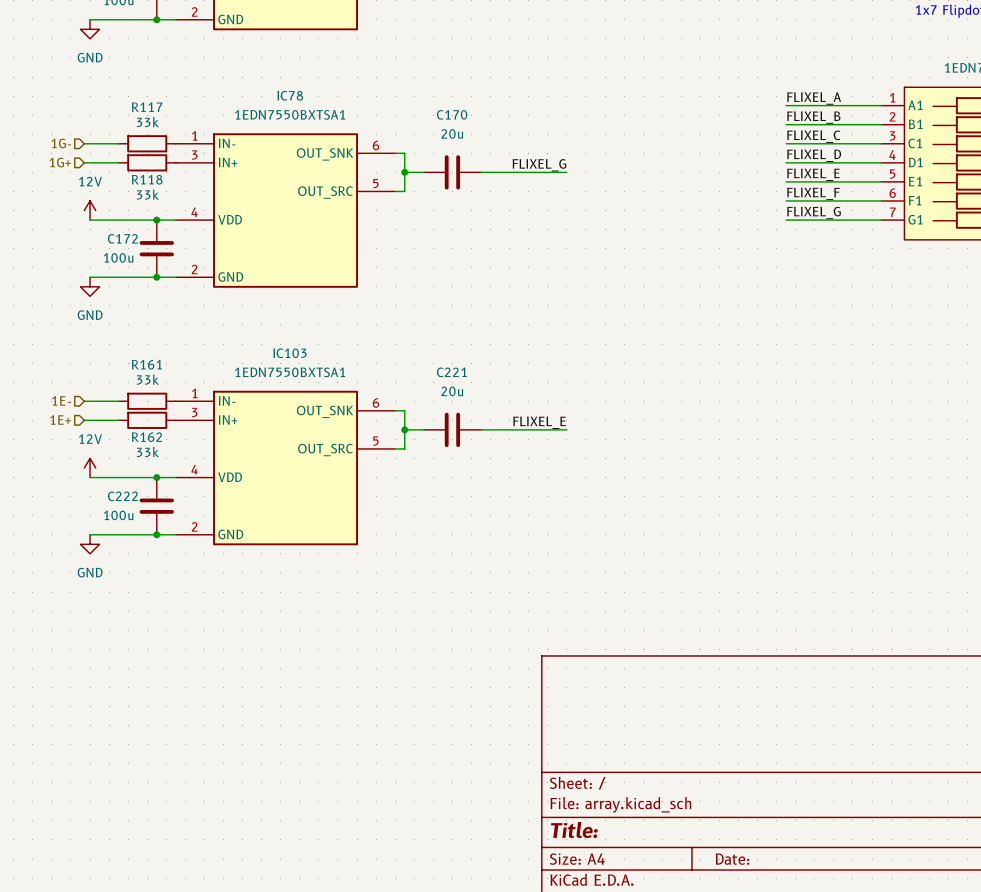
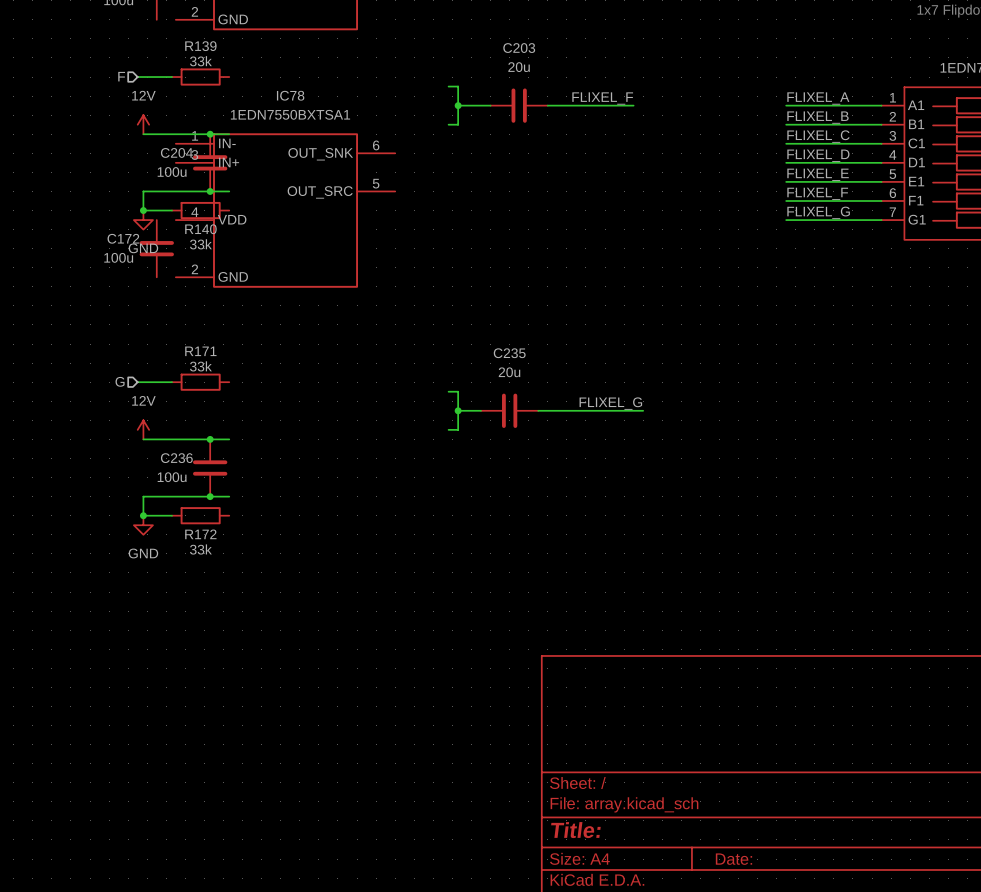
wire: (90, 19) (175, 19) -> none
junction: (156, 19) -> none
power symbol: GND (90, 29) -> none
hierarchical label: none -> F (121, 76)
R139: none -> 33k (200, 77)
label: none -> FLIXEL_F (602, 98)
wire: none -> (458, 105) (490, 105)
junction: none -> (458, 105)
C203: none -> 20u (519, 105)
power symbol: none -> 12V (143, 124)
junction: none -> (210, 134)
hierarchical label: 1G- (61, 143) -> none
wire: (84, 143) (118, 143) -> (137, 77) (172, 77)
R117: 33k (147, 143) -> none
wire: (395, 153) (404, 153) (404, 191) (395, 191) -> (448, 86) (458, 86) (458, 124) (448, 124)
hierarchical label: 1G+ (60, 162) -> none
wire: (84, 162) (118, 162) -> none
R118: 33k (147, 162) -> none
C204: none -> 100u (210, 162)
label: FLIXEL_G (539, 165) -> none
wire: (404, 172) (423, 172) -> none
junction: (404, 172) -> none
C170: 20u (452, 172) -> none
wire: (481, 172) (566, 172) -> (547, 105) (633, 105)
junction: none -> (210, 191)
wire: none -> (229, 191) (143, 191) (143, 210) (172, 210)
power symbol: 12V (90, 210) -> none
R140: none -> 33k (200, 210)
wire: (90, 220) (175, 220) -> (143, 134) (229, 134)
junction position: (156, 220) -> (143, 210)
wire: (90, 277) (175, 277) -> none
junction: (156, 277) -> none
power symbol position: GND (90, 286) -> GND (143, 220)
hierarchical label: none -> G (120, 381)
R171: none -> 33k (200, 382)
hierarchical label: 1E- (61, 400) -> none
wire: (84, 401) (118, 401) -> (137, 382) (172, 382)
R161: 33k (147, 401) -> none
wire: (395, 410) (404, 410) (404, 448) (395, 448) -> (448, 391) (458, 391) (458, 429) (448, 429)
wire: none -> (458, 410) (481, 410)
junction: none -> (458, 410)
C235: none -> 20u (509, 410)
wire: none -> (538, 410) (643, 410)
hierarchical label: 1E+ (60, 419) -> none
wire: (84, 420) (118, 420) -> none
R162: 33k (147, 420) -> none
label: FLIXEL_E (539, 422) -> FLIXEL_G (610, 403)
wire: (404, 429) (423, 429) -> none
junction: (404, 429) -> none
C221: 20u (452, 429) -> none
wire: (481, 429) (566, 429) -> none
junction: none -> (210, 439)
power symbol position: 12V (90, 468) -> 12V (143, 429)
C236: none -> 100u (210, 468)
IC103: 1EDN7550BXTSA1 (285, 468) -> none
wire: (90, 477) (175, 477) -> (143, 439) (229, 439)
junction: (156, 477) -> none
junction: none -> (210, 496)
wire: none -> (229, 496) (143, 496) (143, 515) (172, 515)
C222: 100u (156, 506) -> none
junction: none -> (143, 515)
R172: none -> 33k (200, 515)
wire: (90, 534) (175, 534) -> none
junction: (156, 534) -> none
power symbol position: GND (90, 544) -> GND (143, 525)

